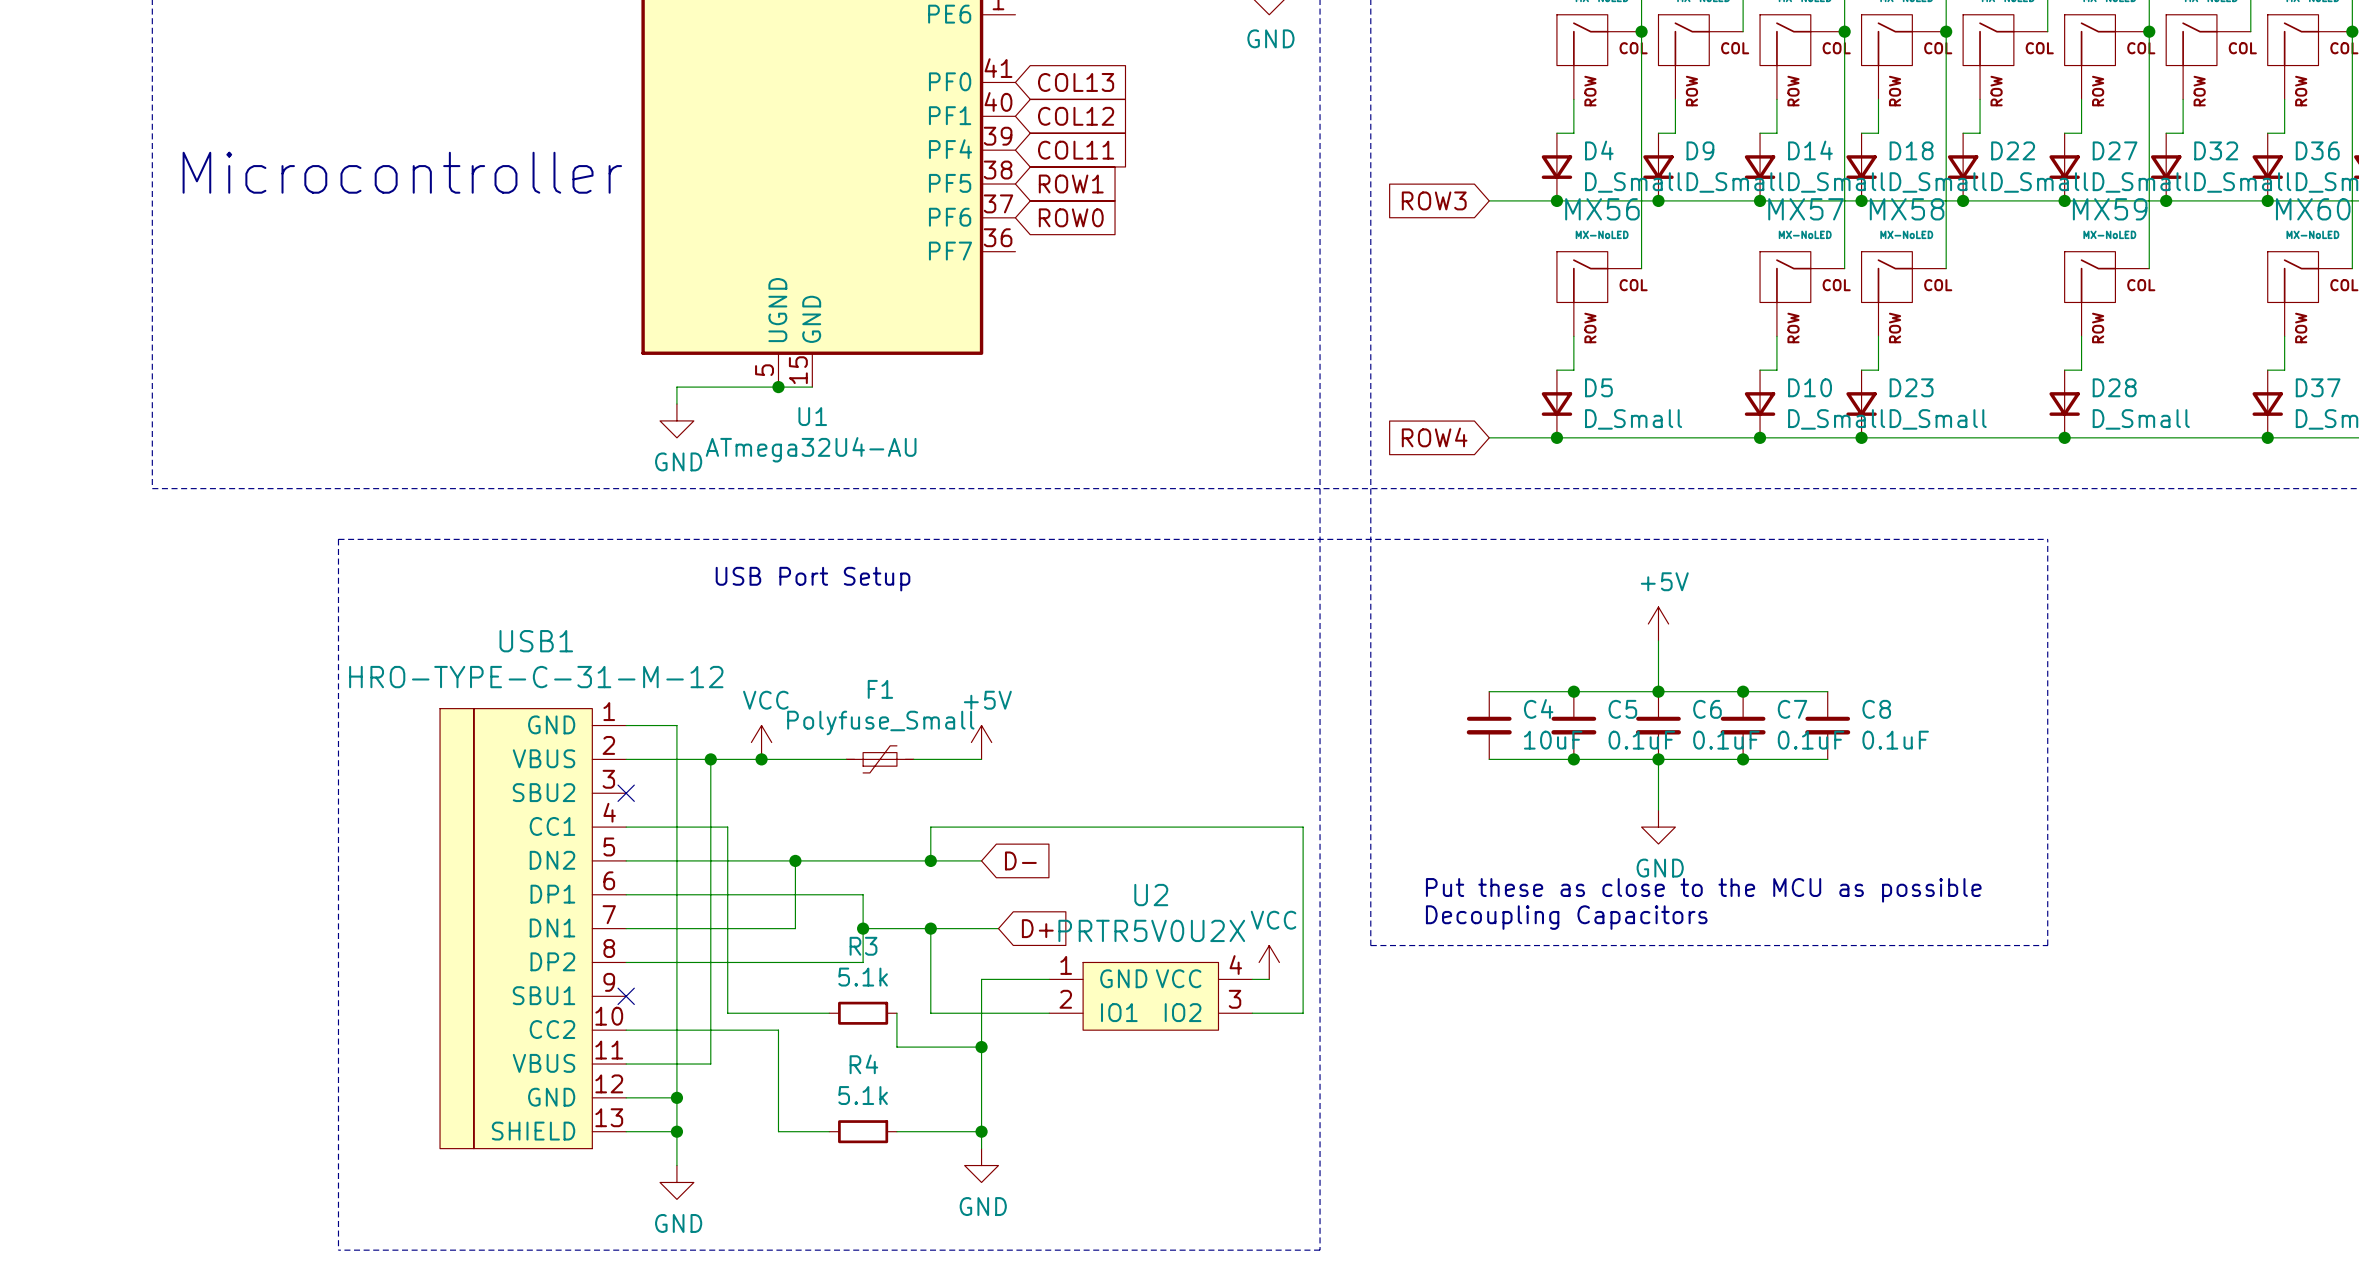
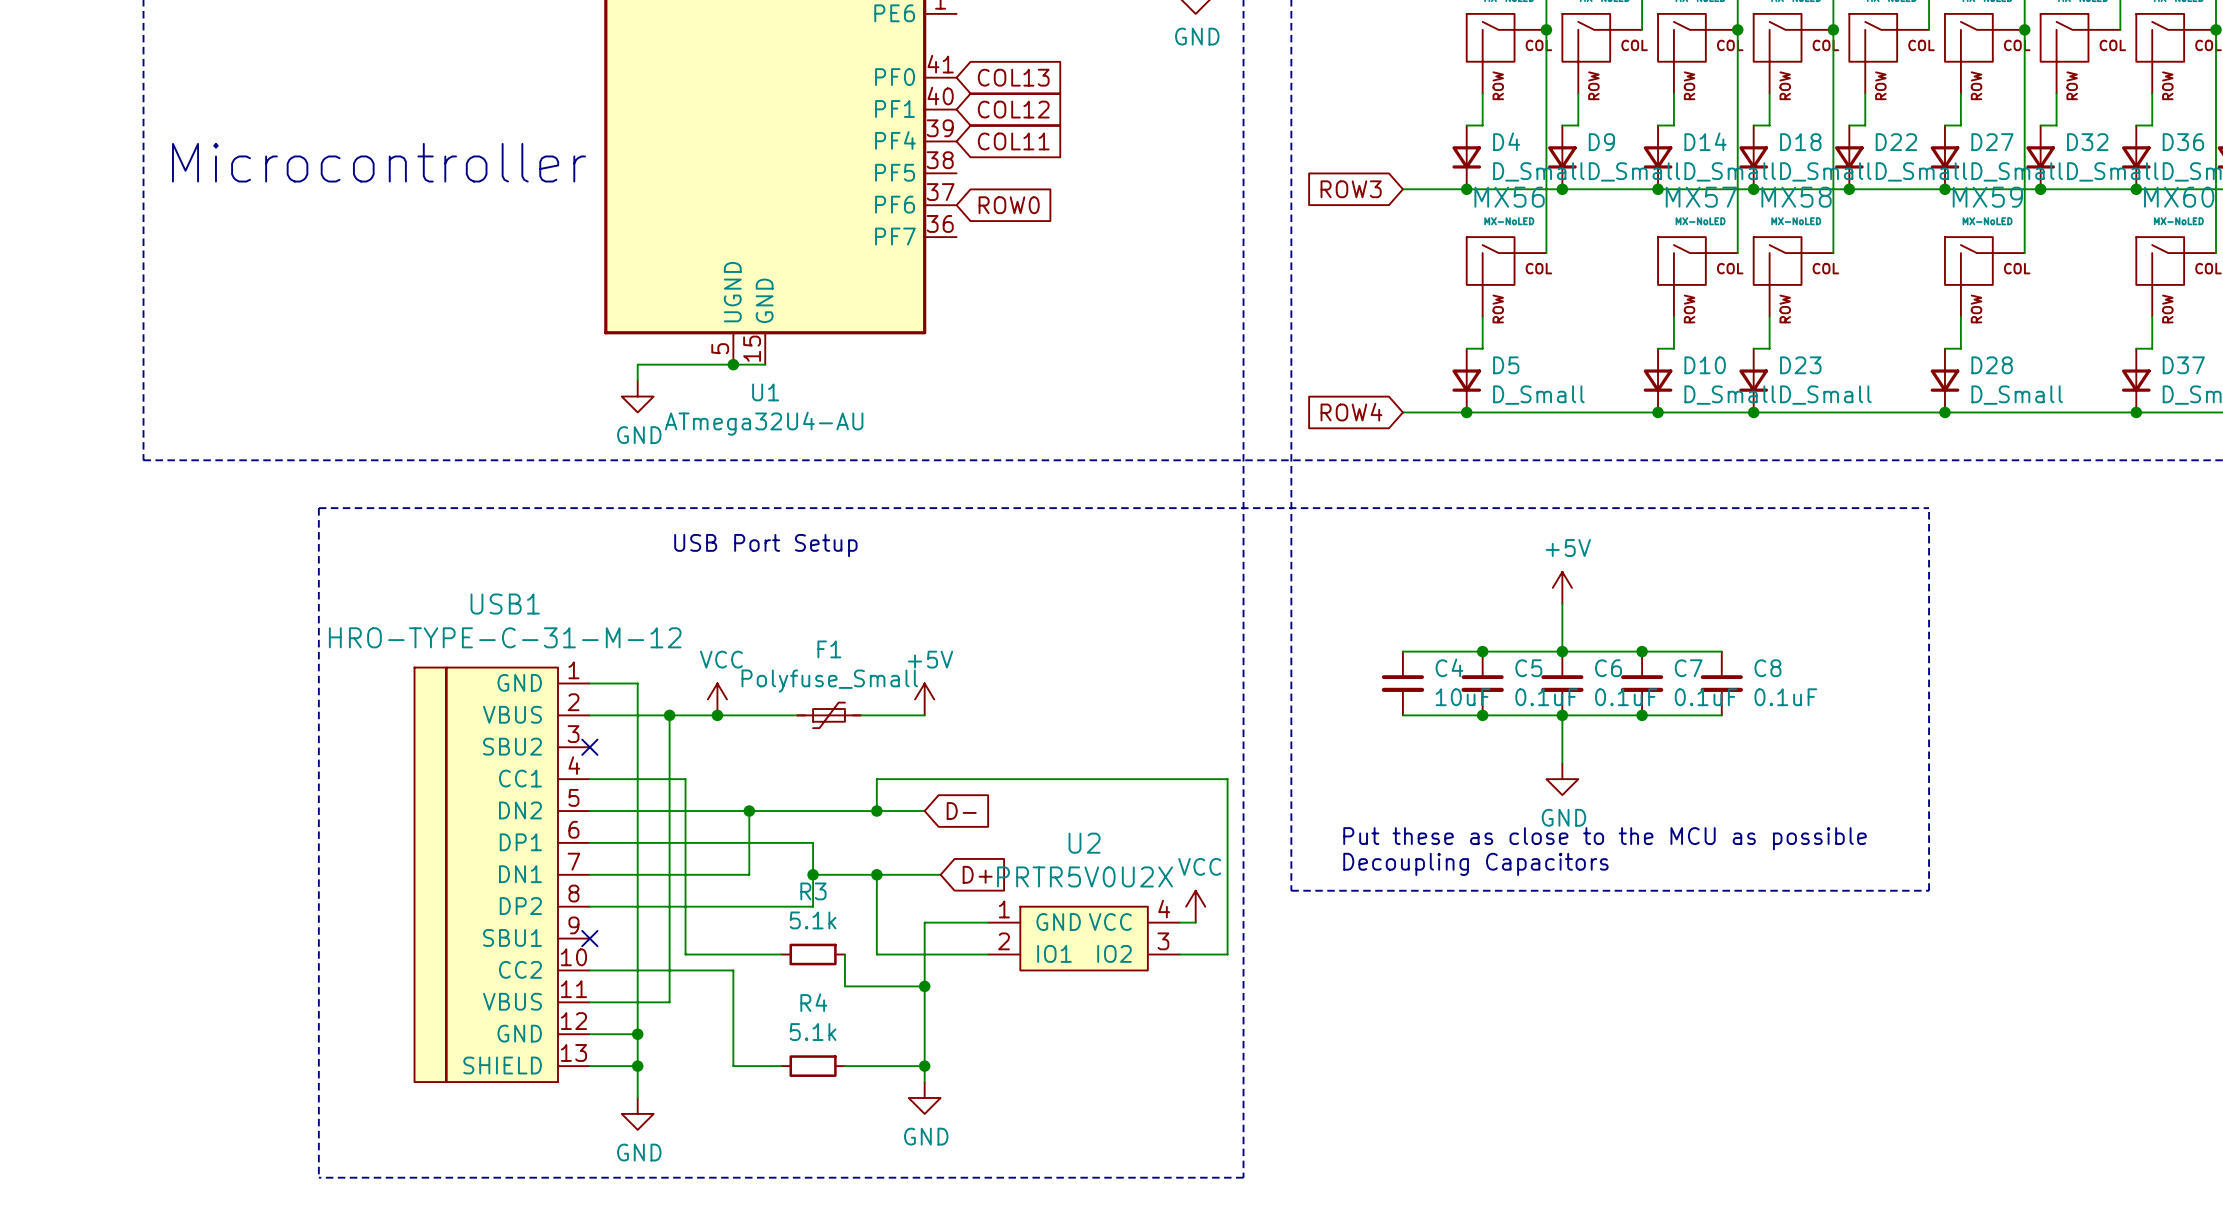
global label: ROW1 (1071, 184) -> none

